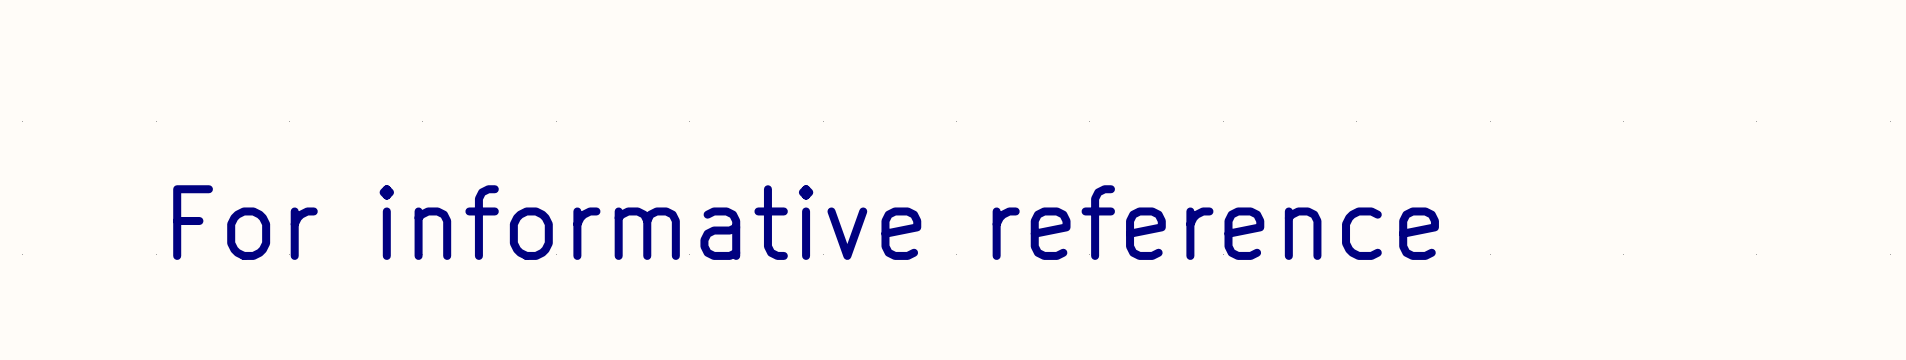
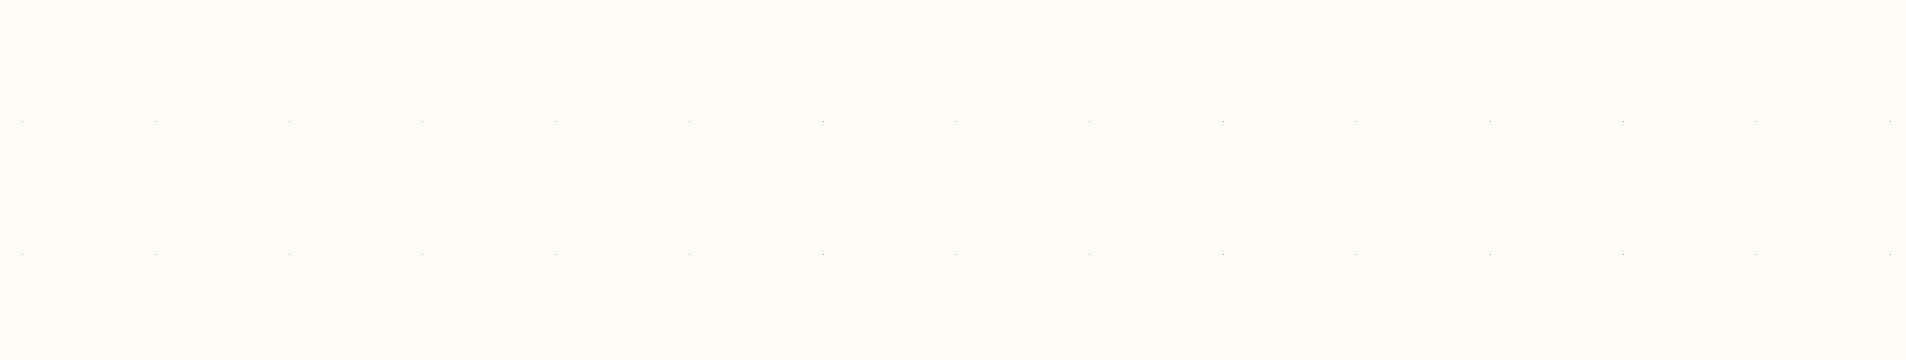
text: For informative reference (806, 222) -> none

